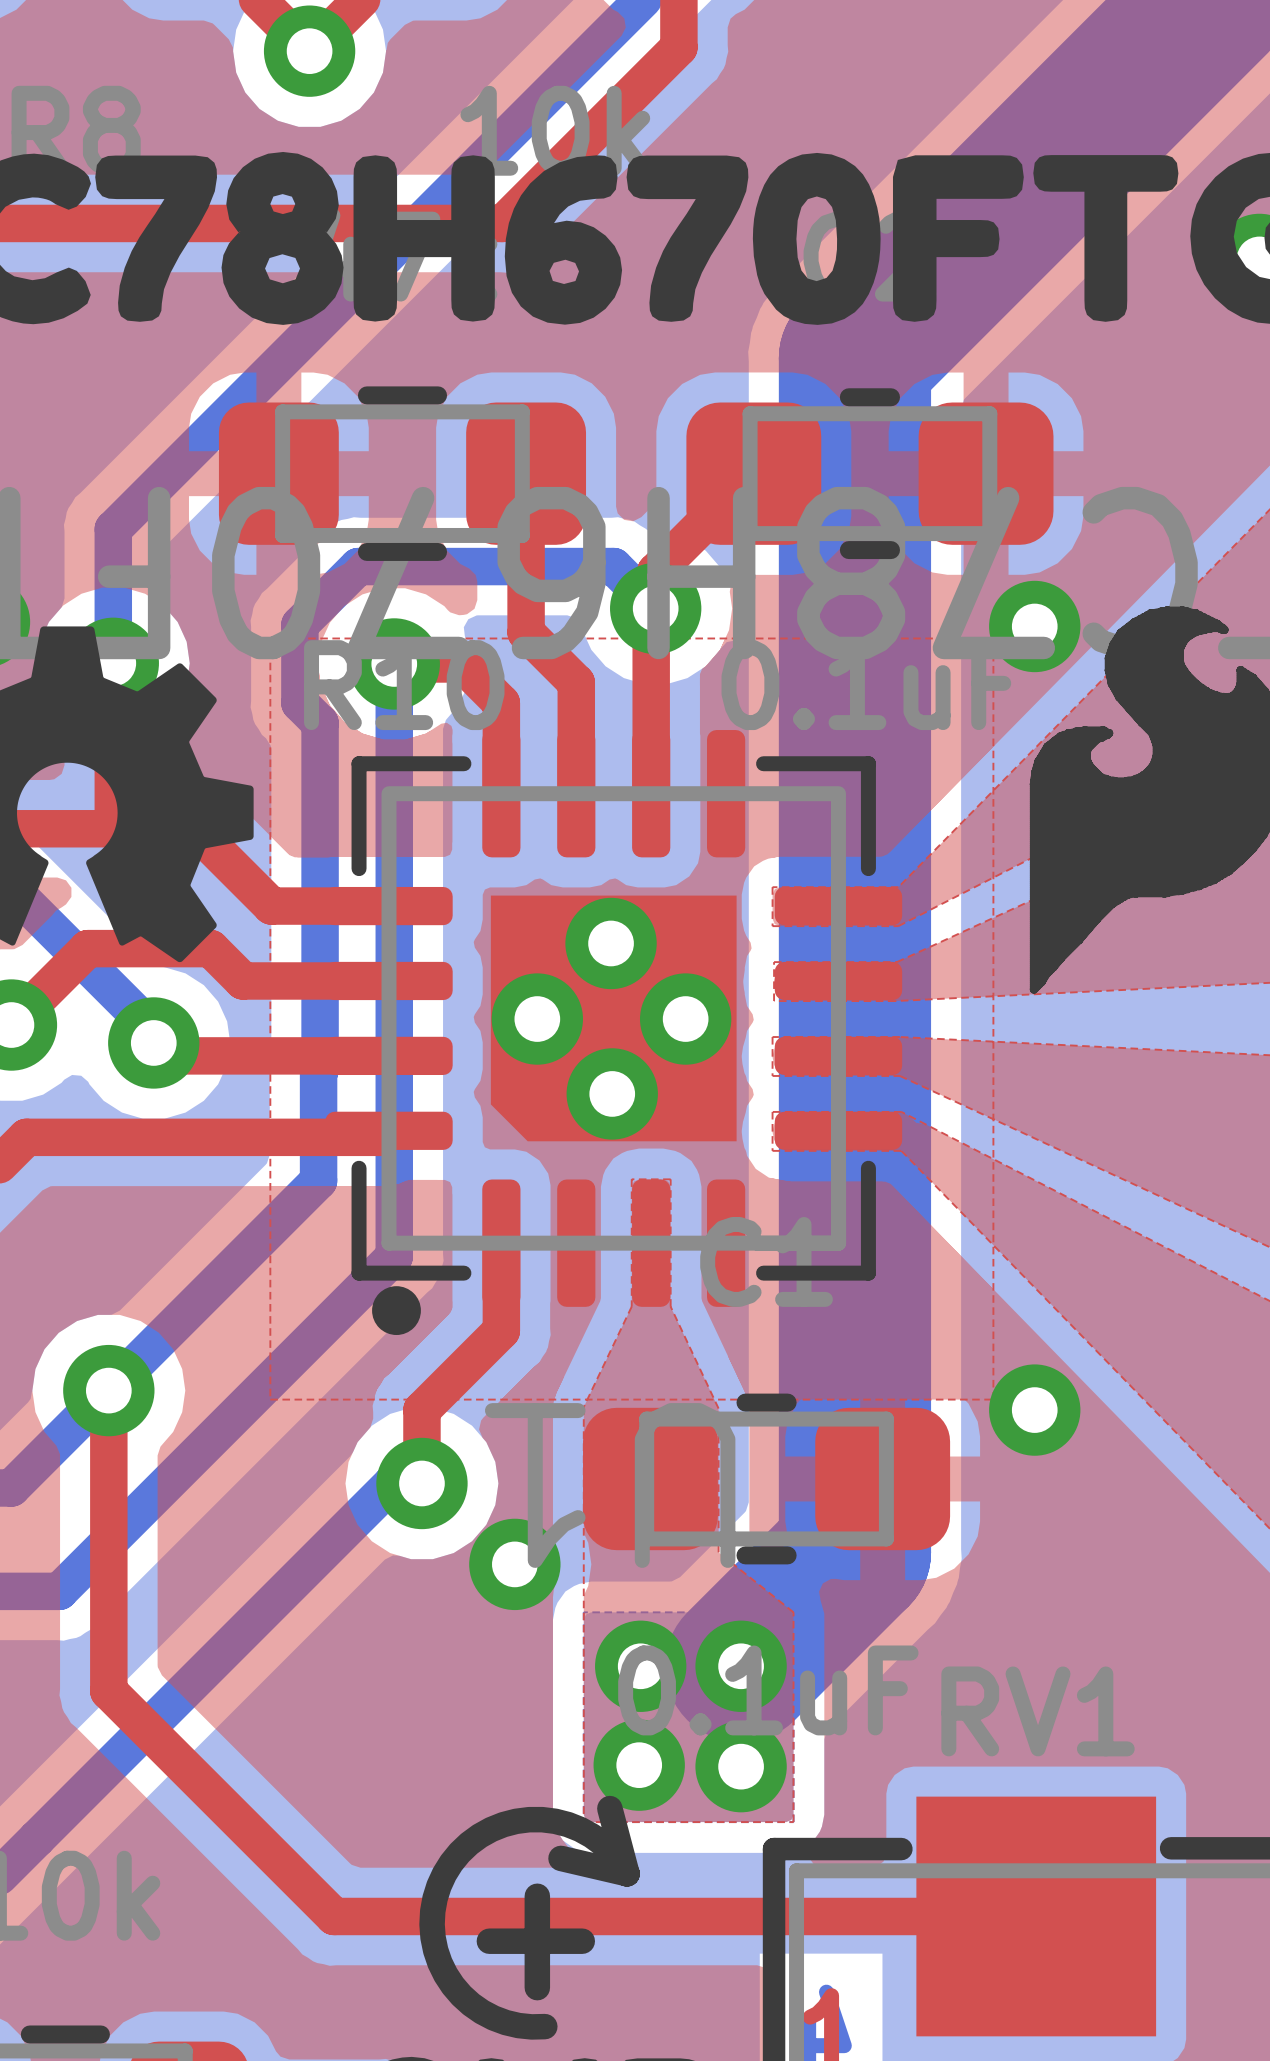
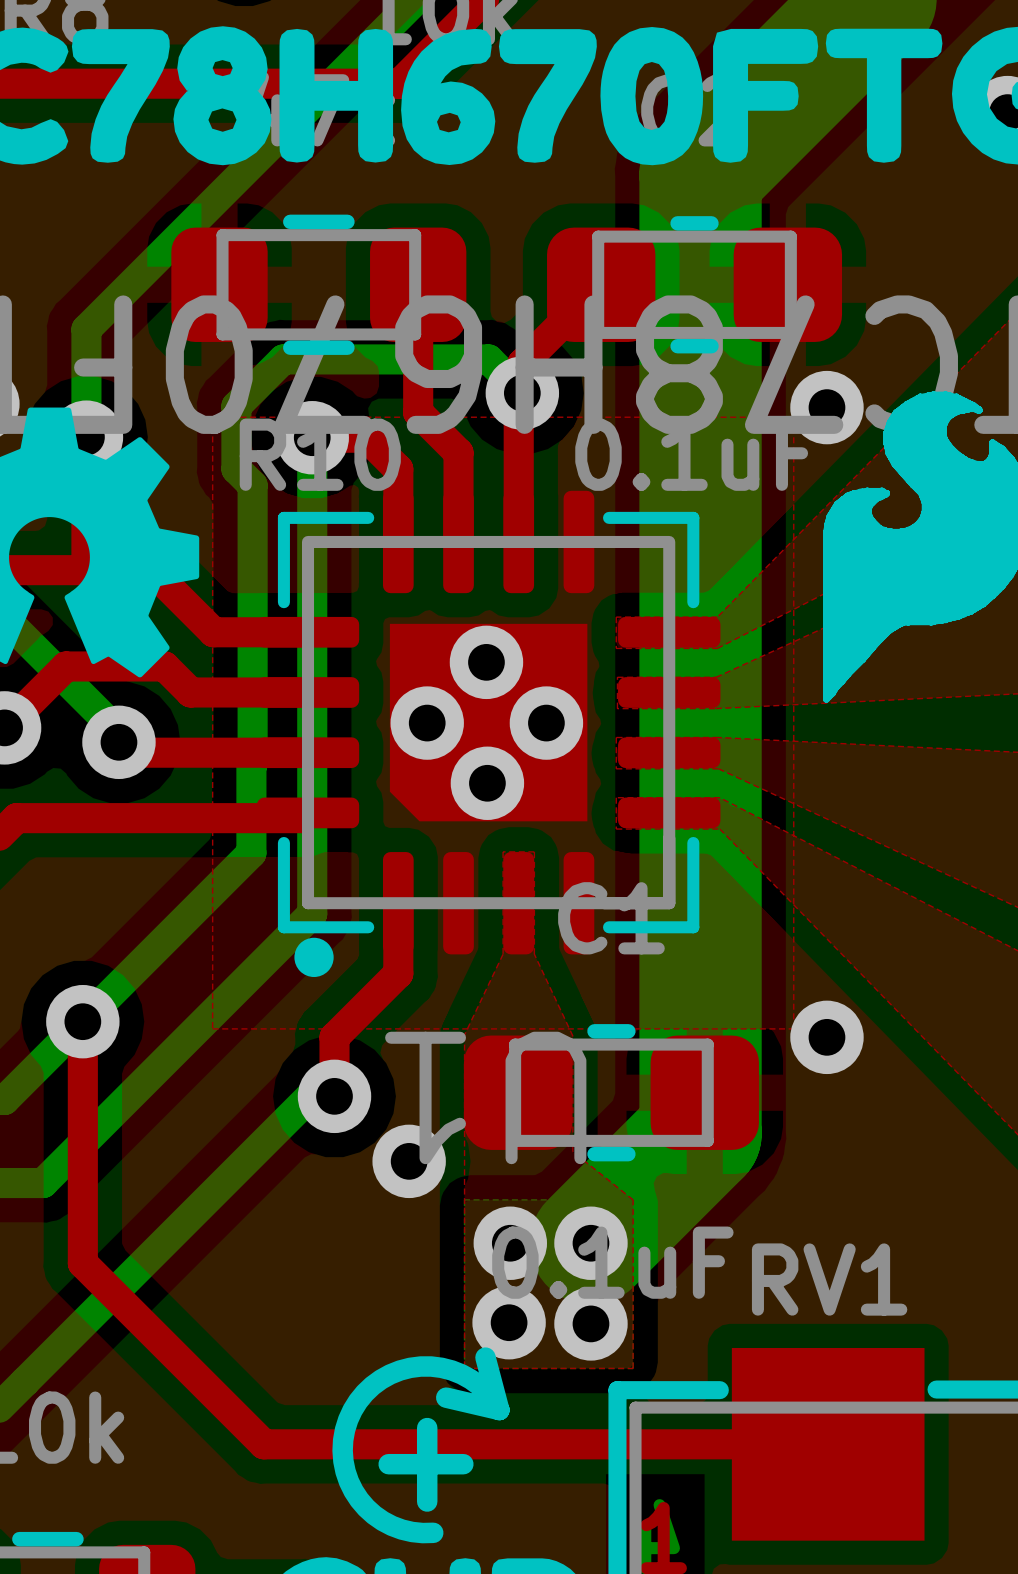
bottom track: (877, 335) (854, 358) (854, 1552) -> (700, 174) (700, 1133) (682, 1151)

